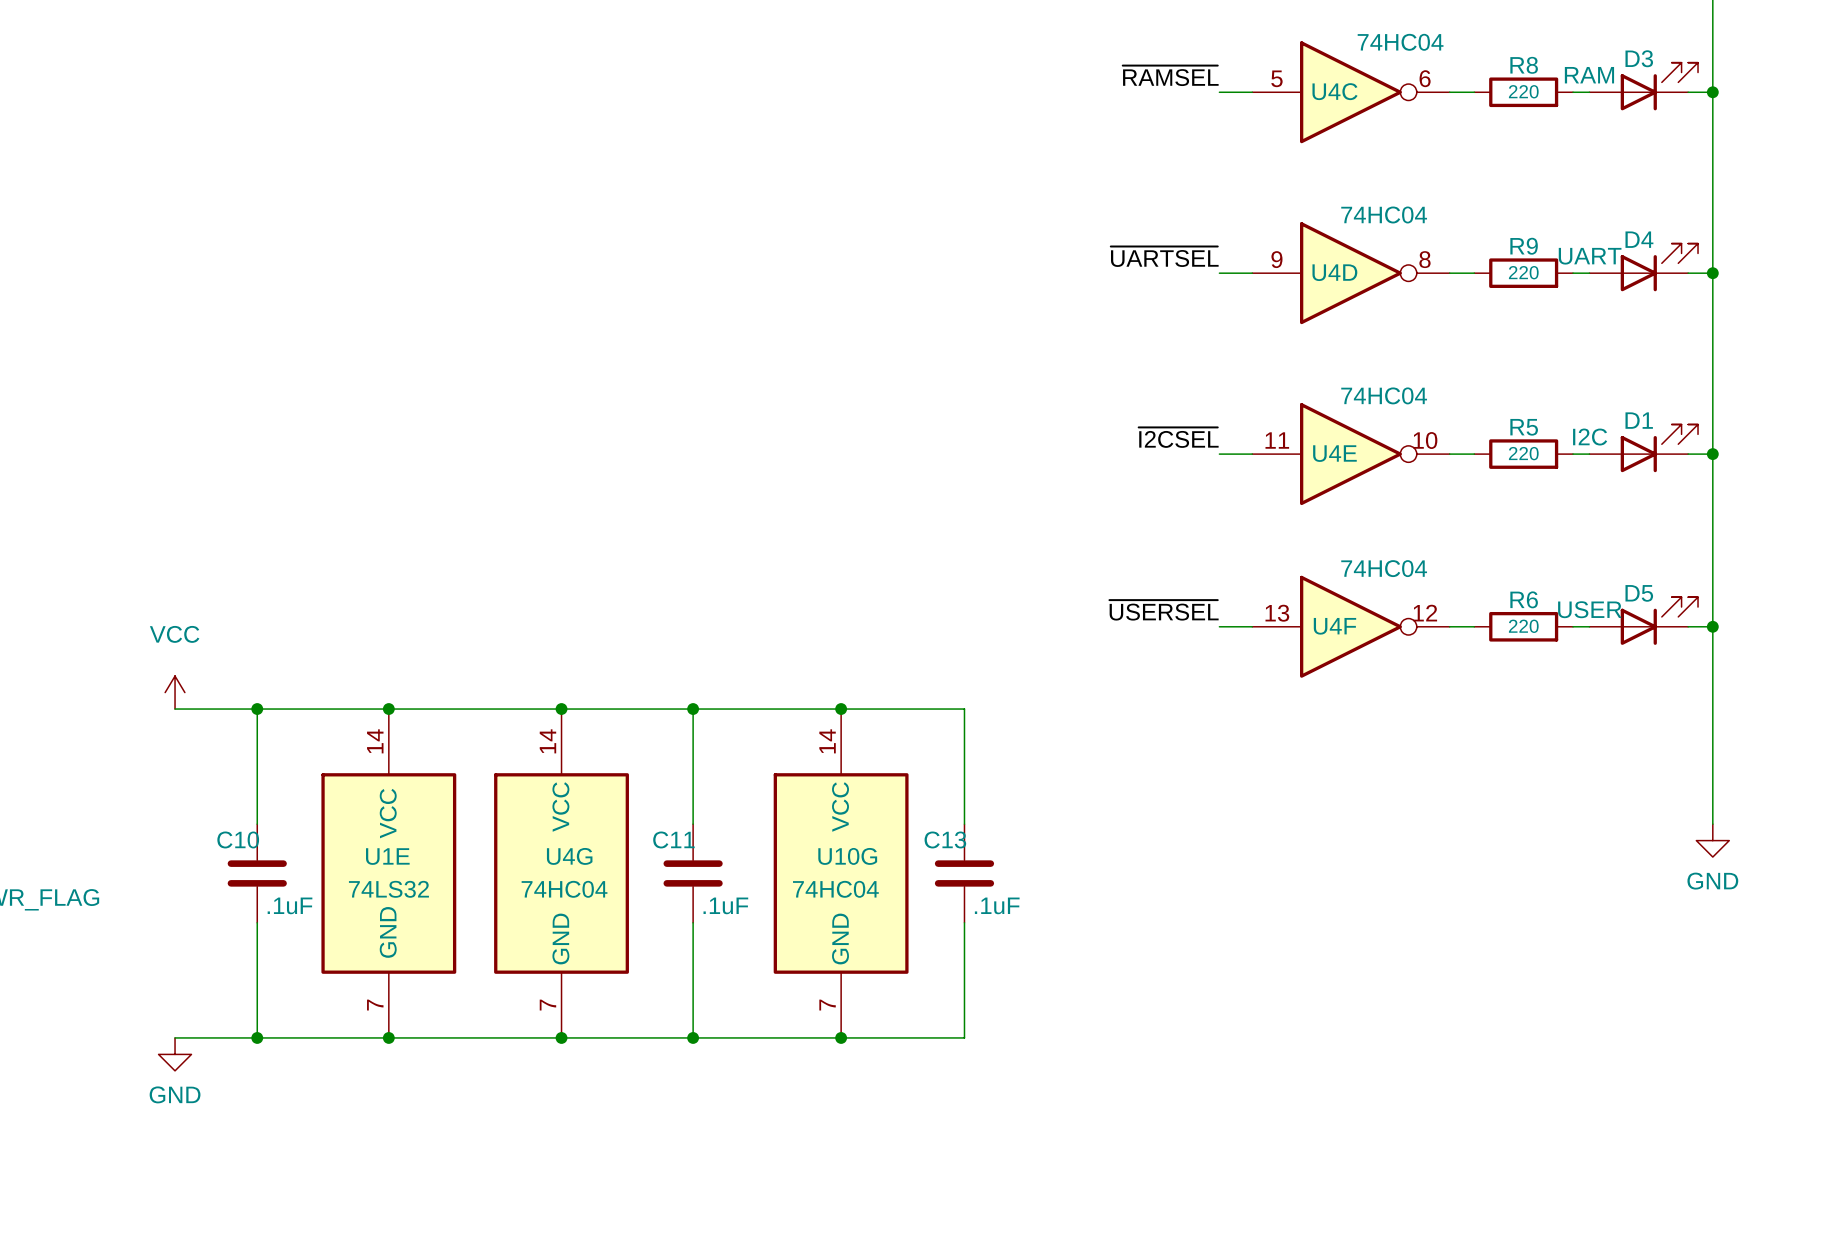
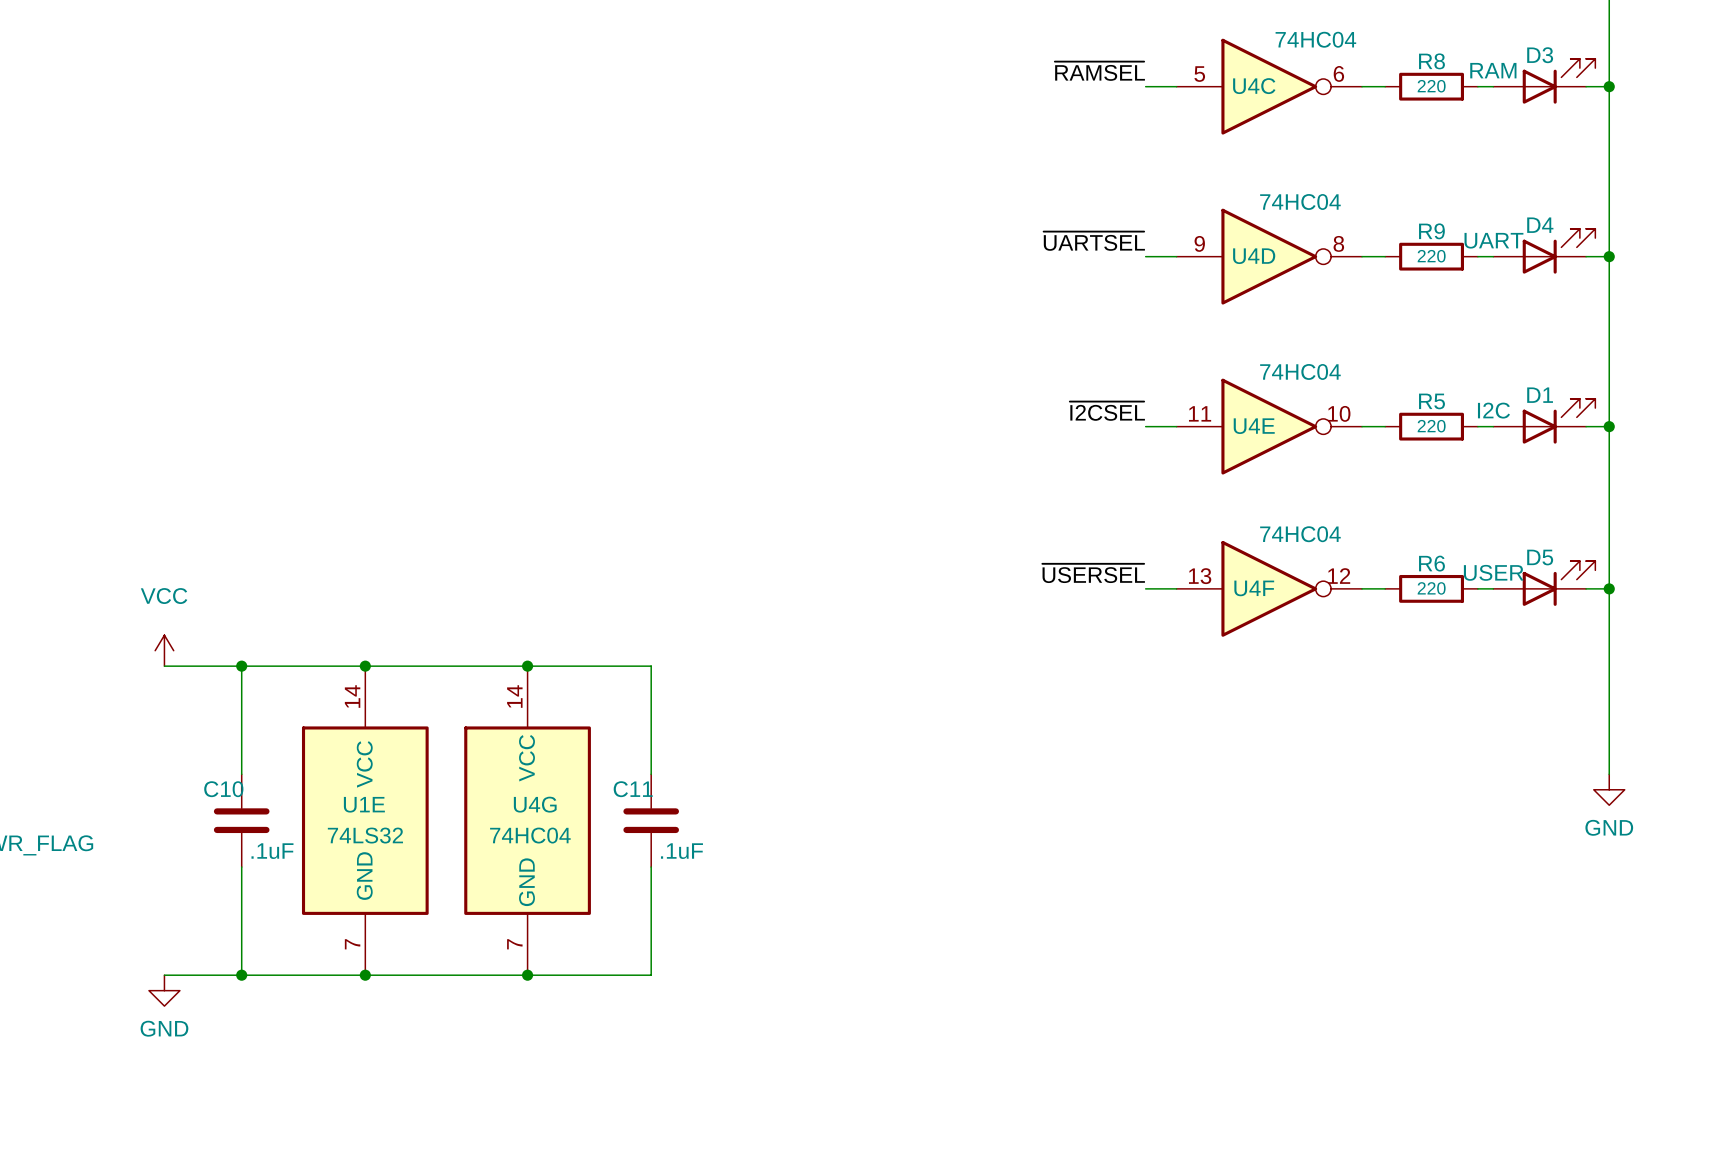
wire: (693, 709) (964, 709) (964, 824) -> none
junction: (693, 709) -> none
junction: (841, 709) -> none
U10G: 74HC04 (841, 873) -> none
C13: .1uF (964, 873) -> none
wire: (964, 922) (964, 1037) (693, 1037) -> none
junction: (693, 1037) -> none
junction: (841, 1037) -> none

